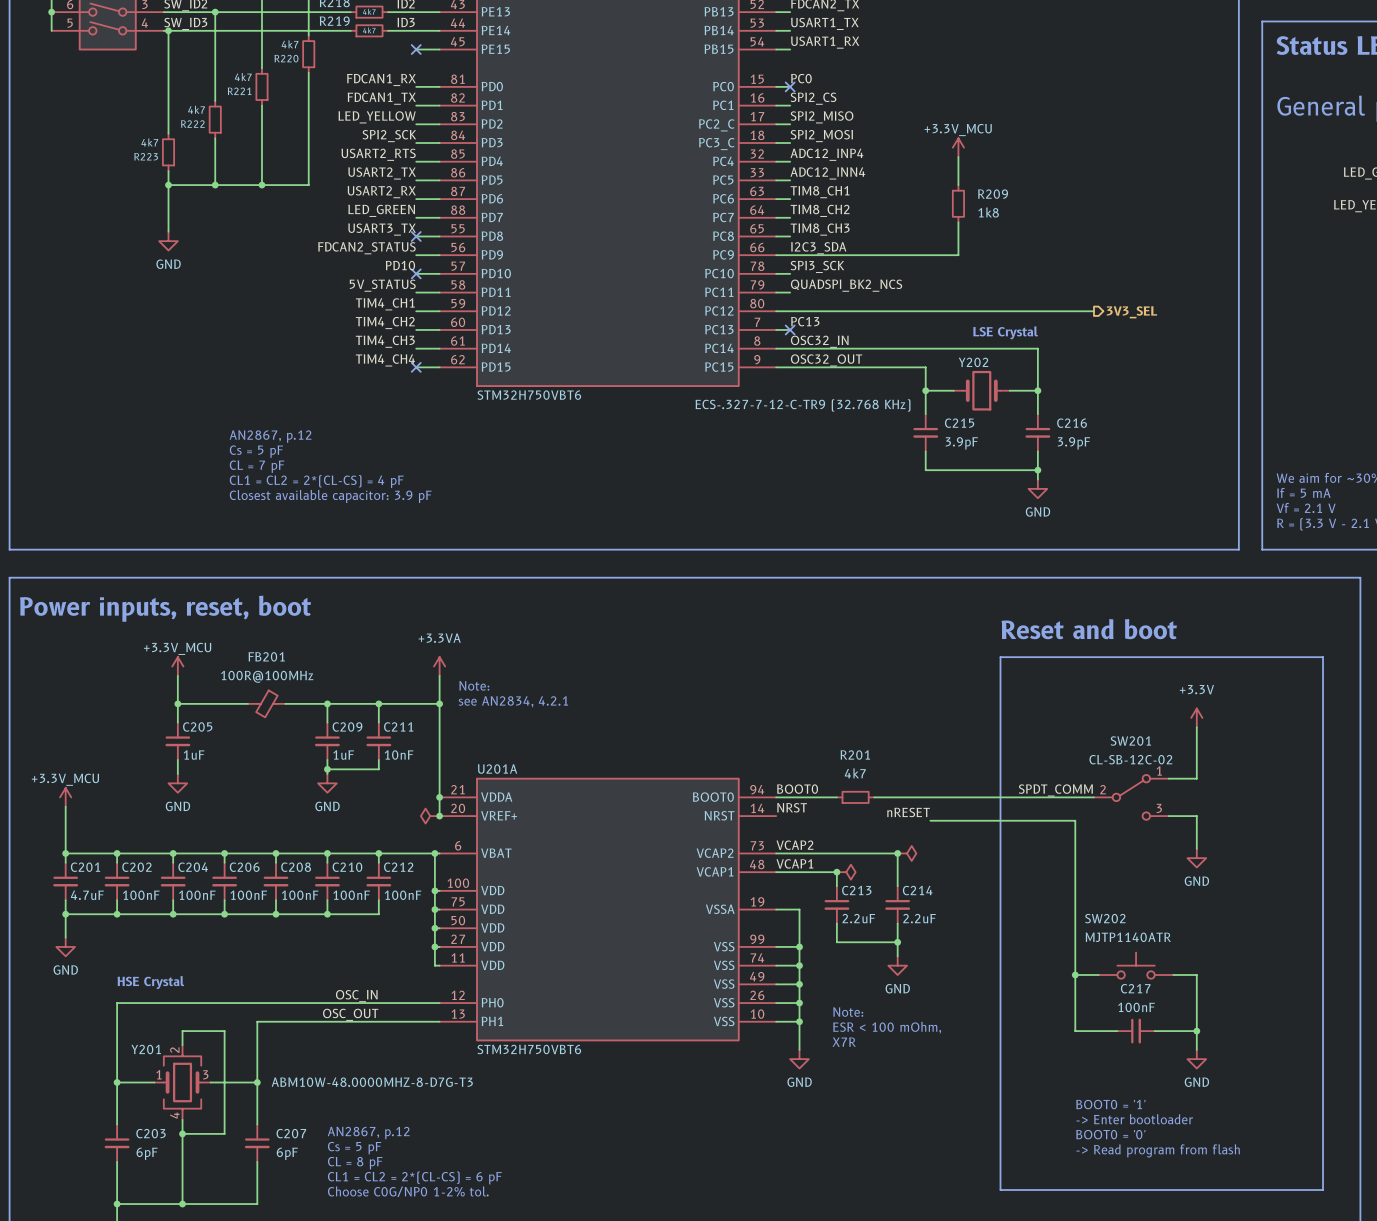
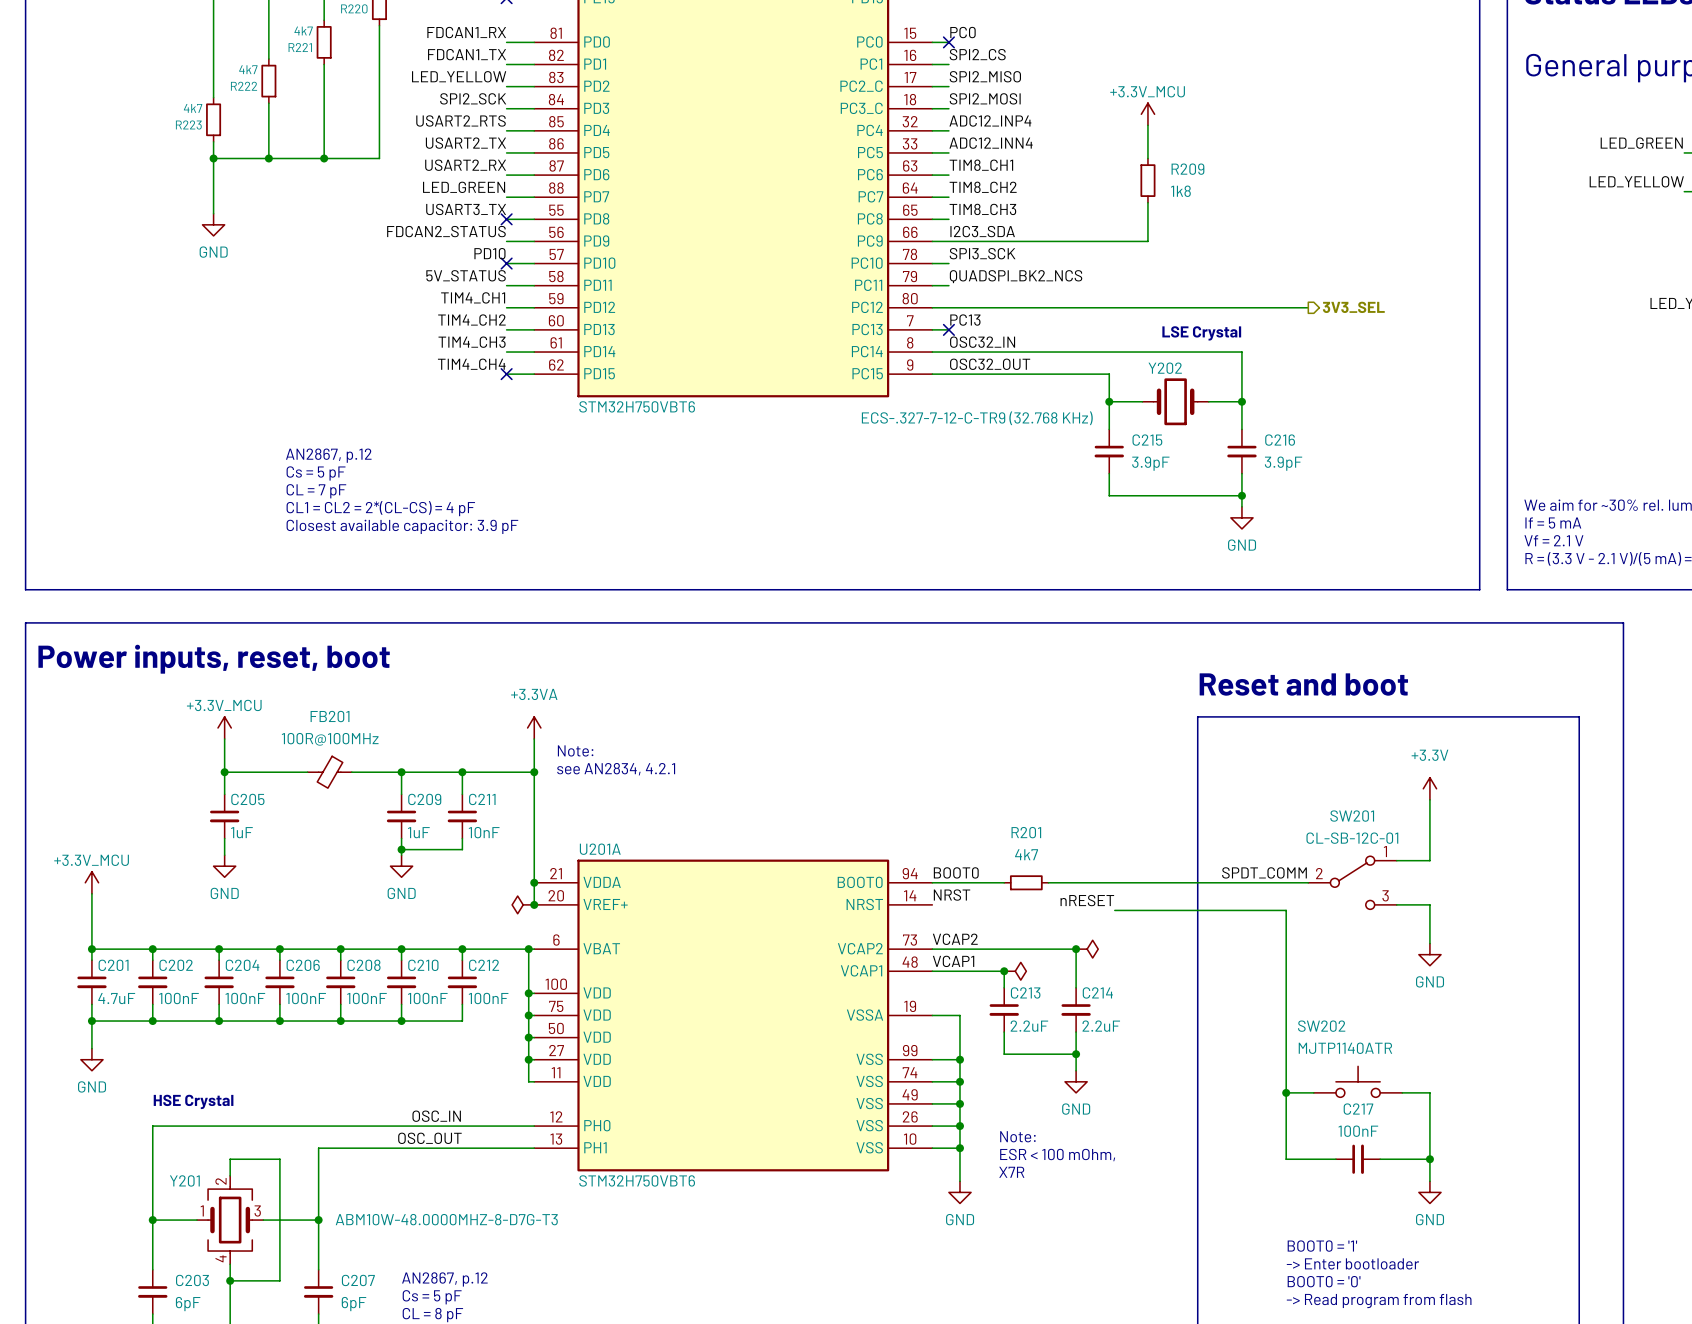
SW201 value: CL-SB-12C-02 (1130, 759) -> CL-SB-12C-01 (1352, 838)

